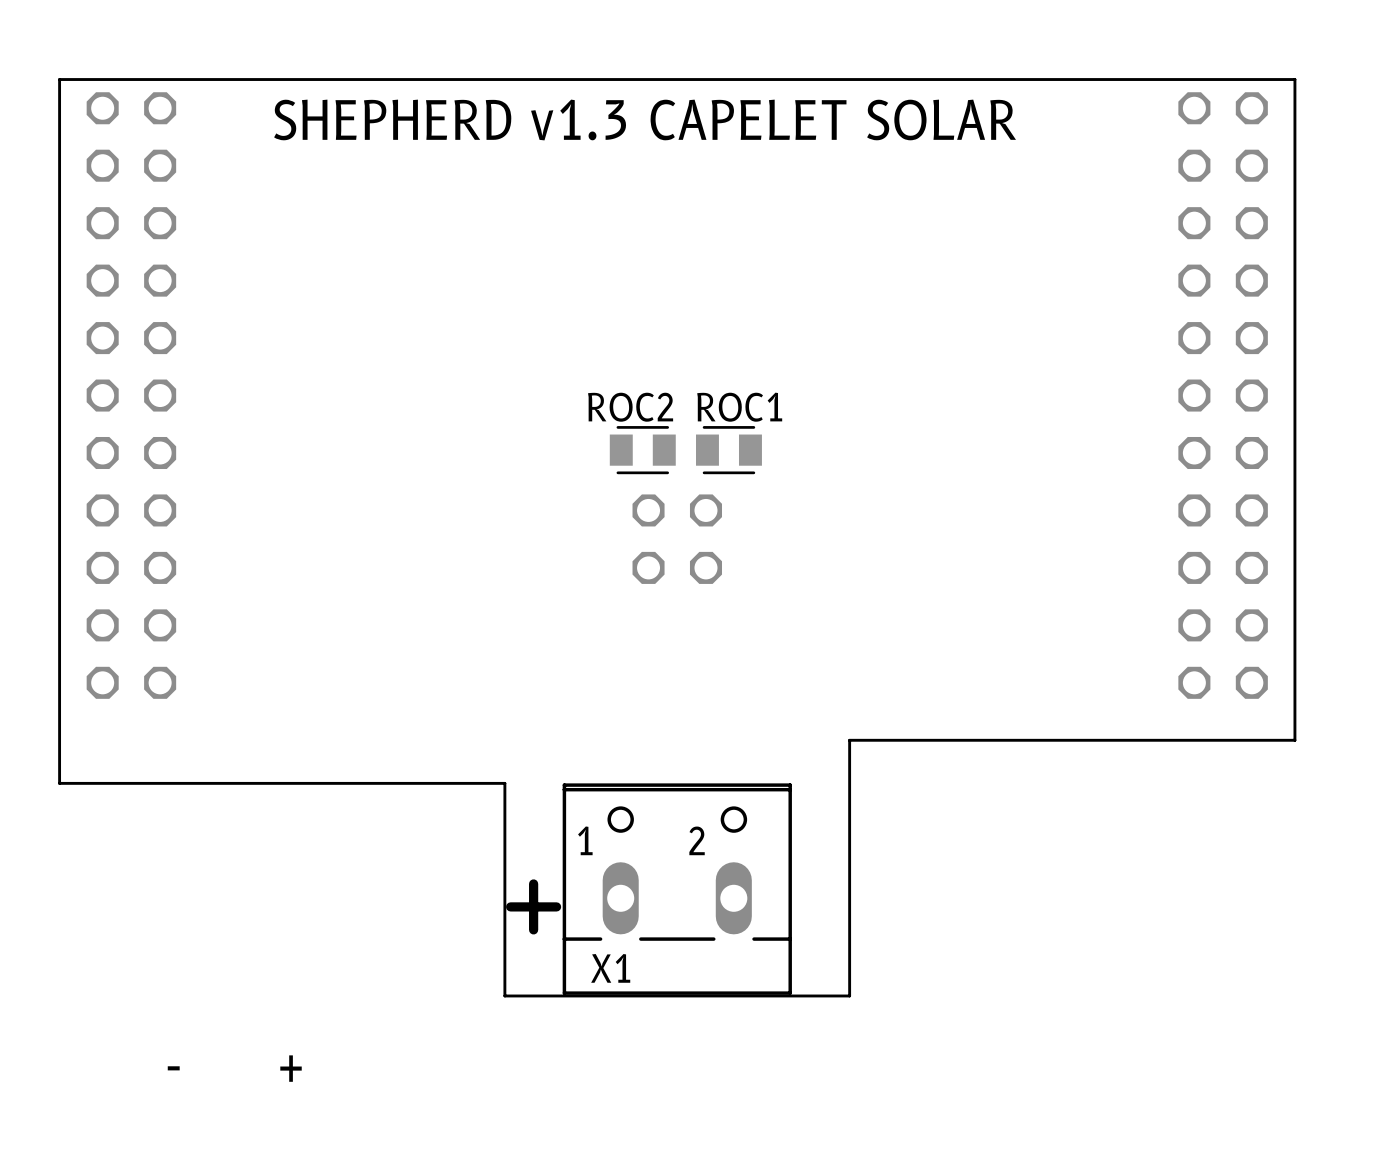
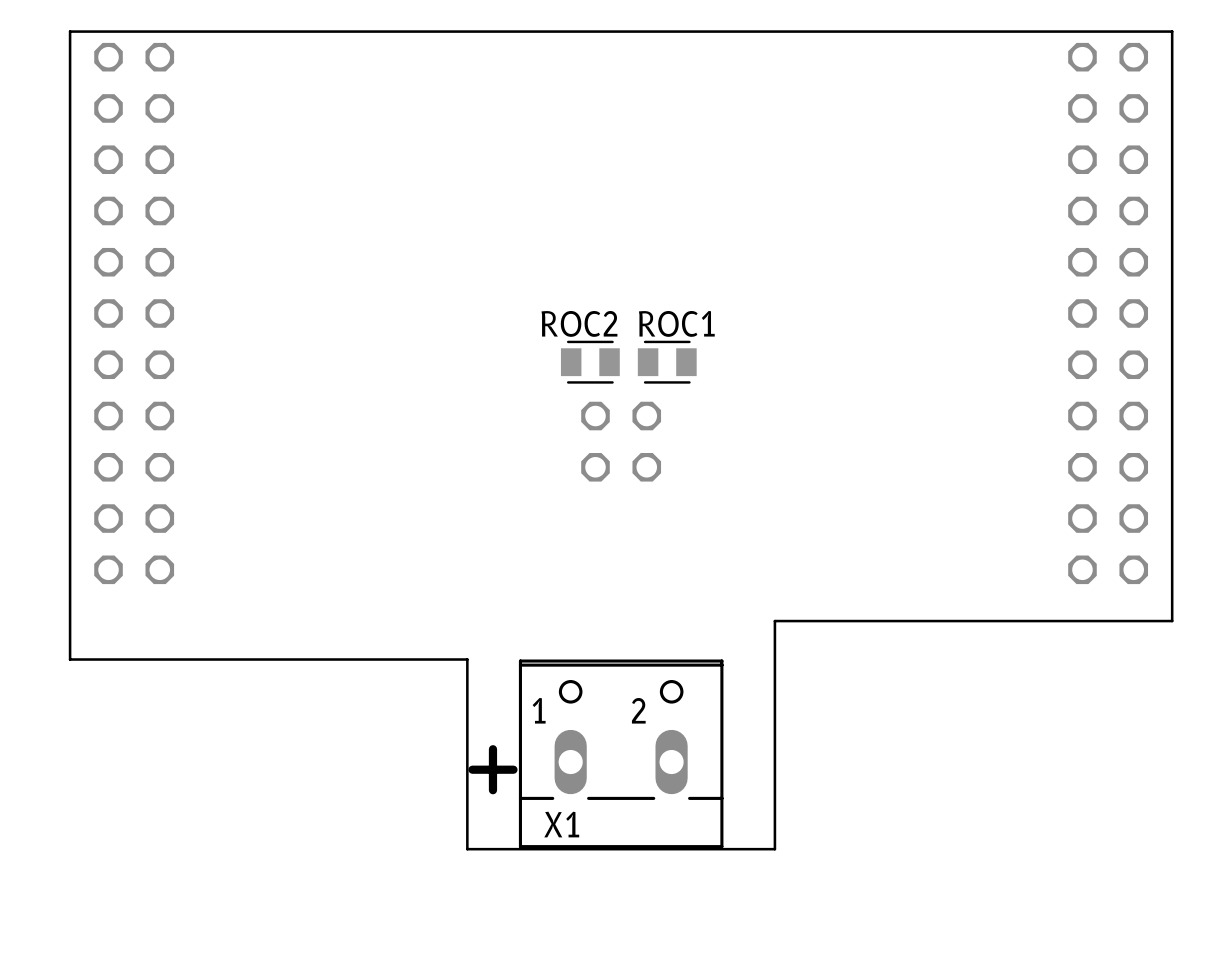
text: SHEPHERD v1.3 CAPELET SOLAR (645, 120) -> none
text: - (173, 1068) -> none
text: + (291, 1068) -> none

